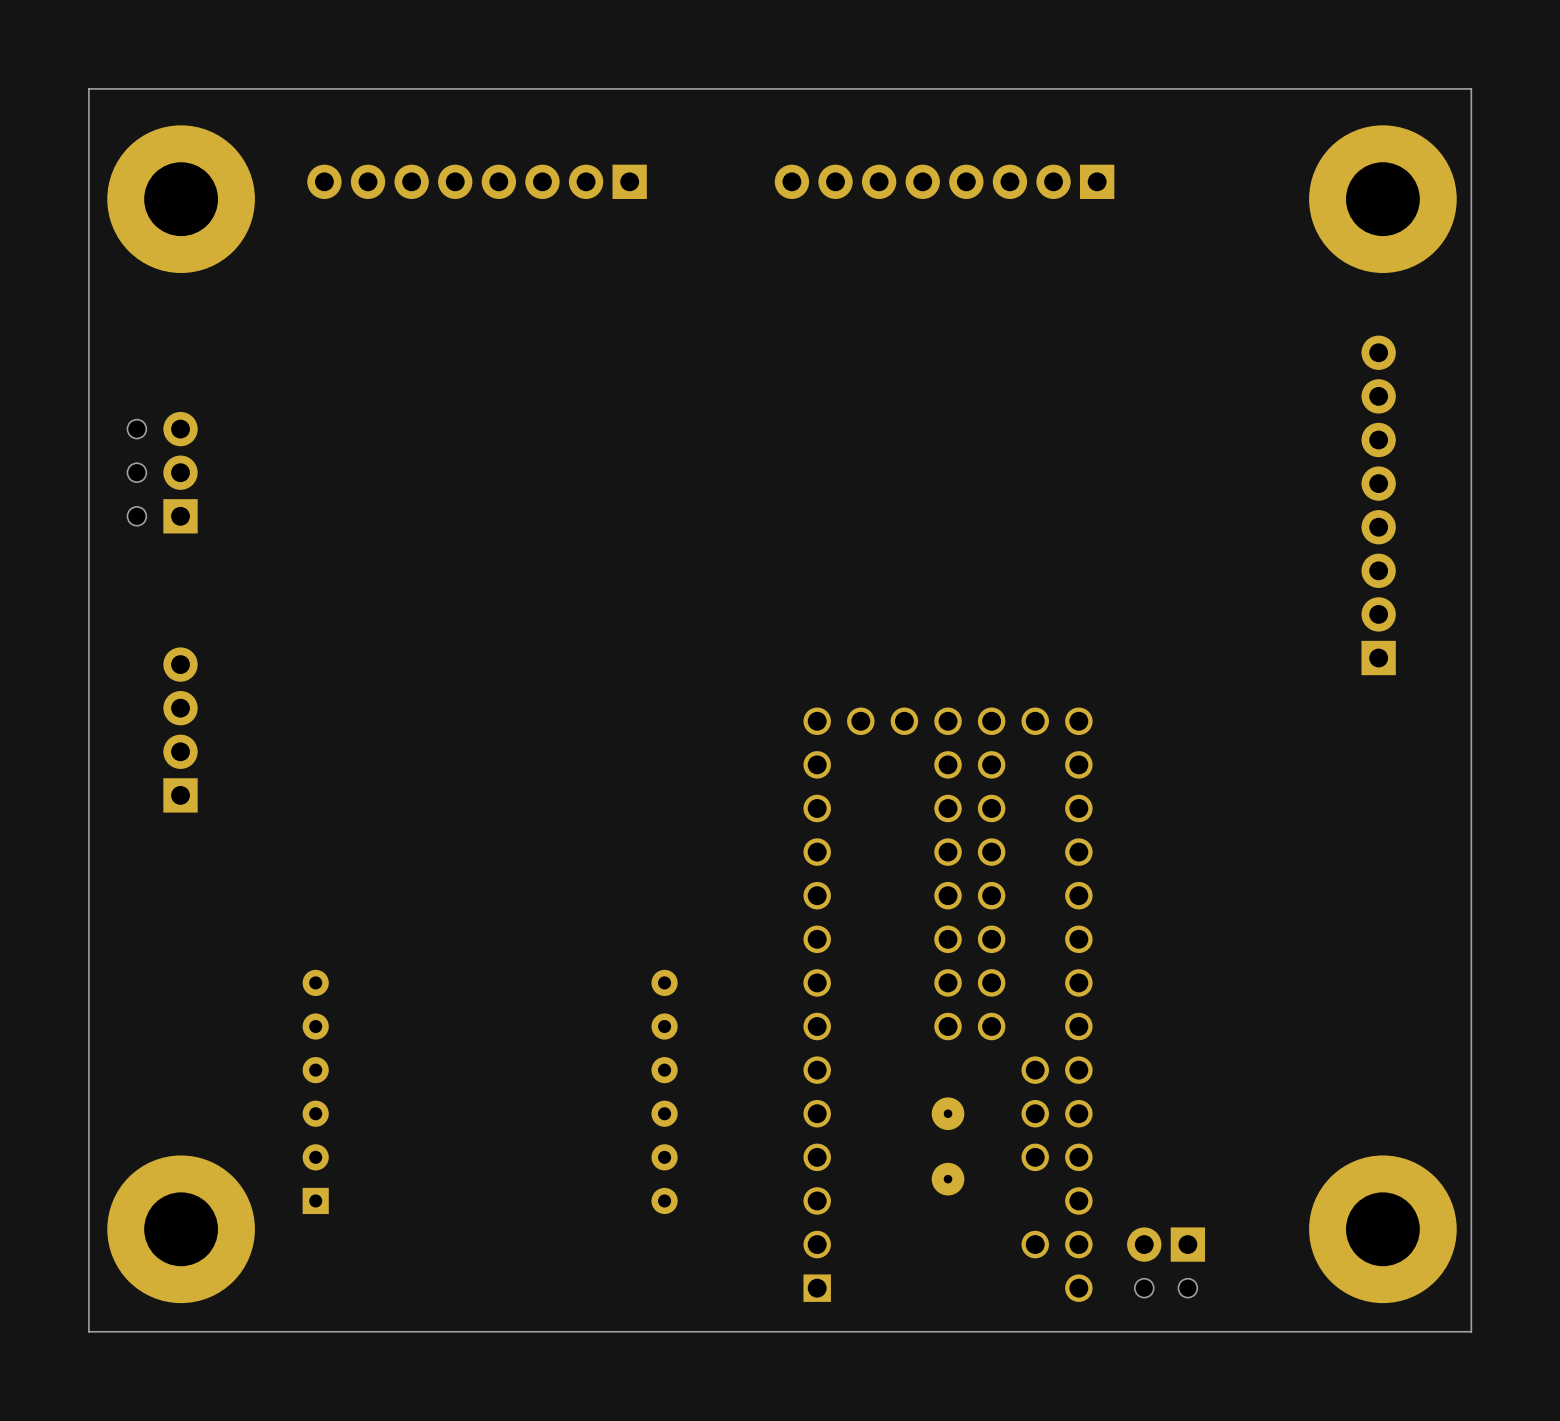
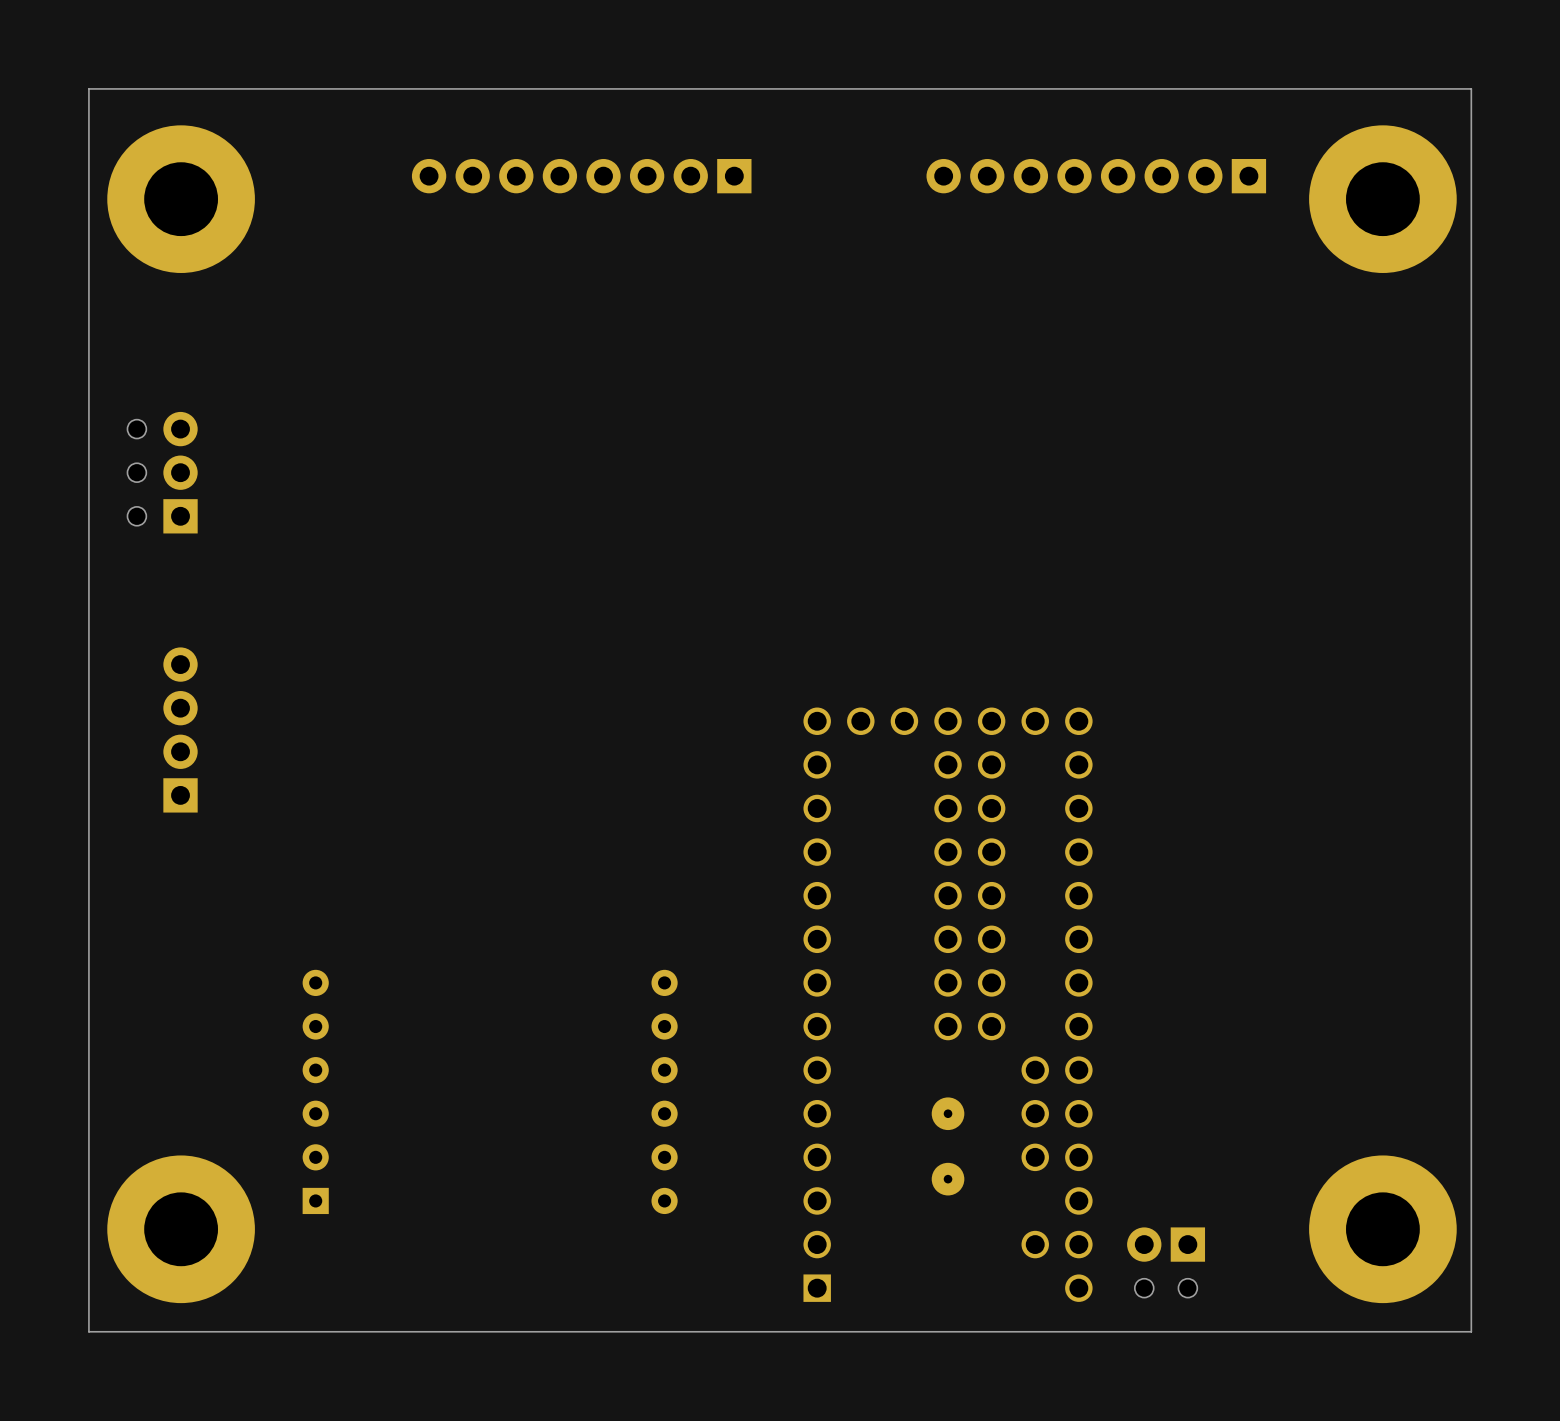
part position: (477, 181) -> (581, 176)
part position: (944, 181) -> (1096, 176)
part: (1378, 505) -> none

